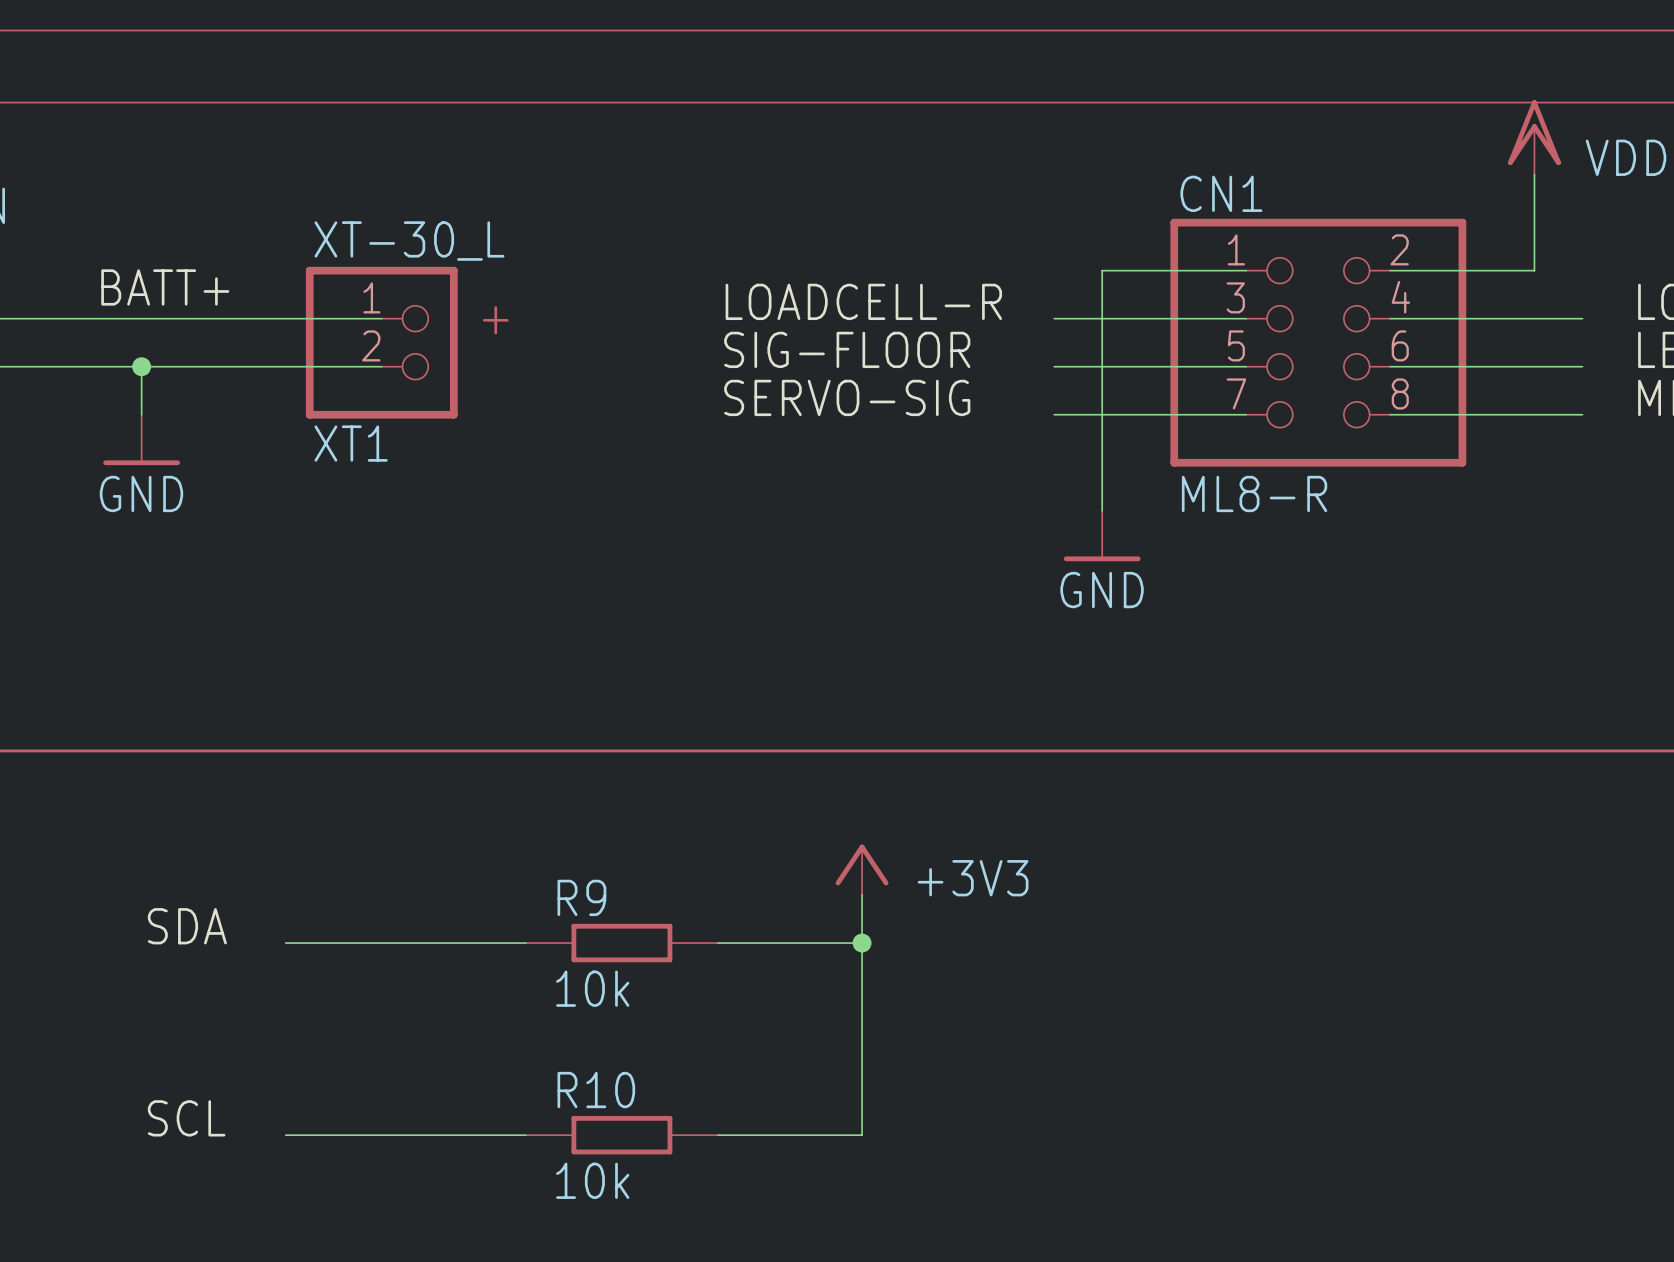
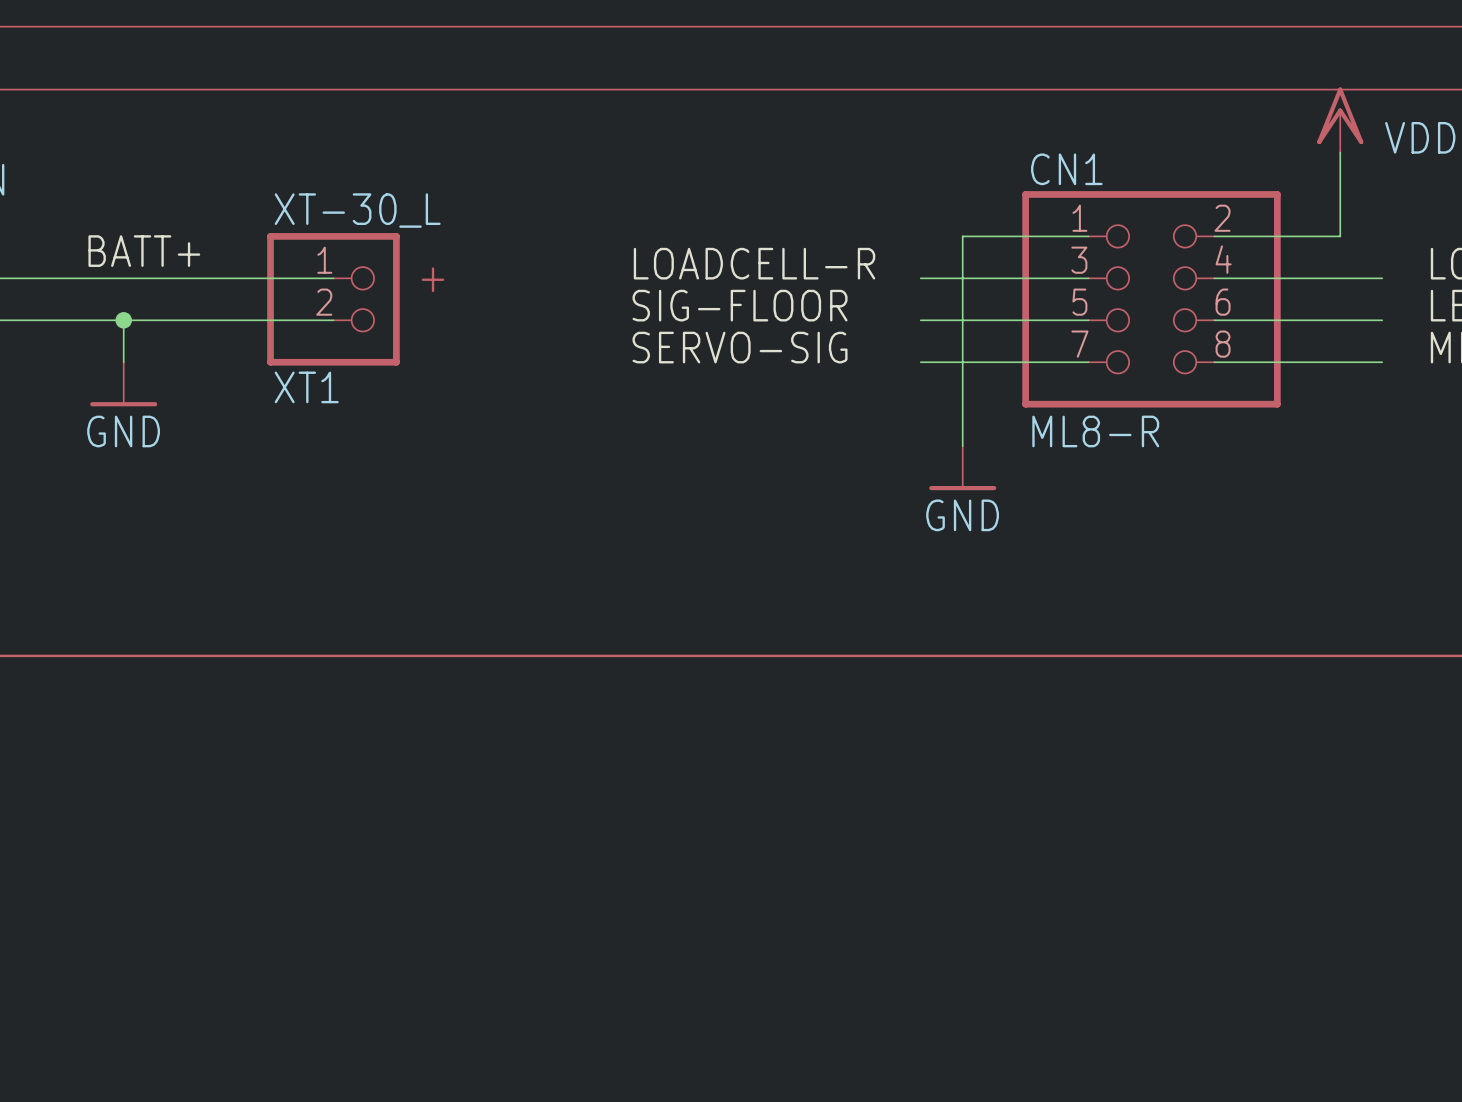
power symbol: +3V3 (862, 869) -> none
wire: (862, 895) (862, 1135) (717, 1135) -> none
label: SDA (187, 926) -> none
wire: (285, 943) (525, 943) -> none
R9: 10k (621, 943) -> none
wire: (717, 943) (862, 943) -> none
junction: (862, 943) -> none
label: SCL (186, 1118) -> none
wire: (285, 1135) (525, 1135) -> none
R10: 10k (621, 1135) -> none

